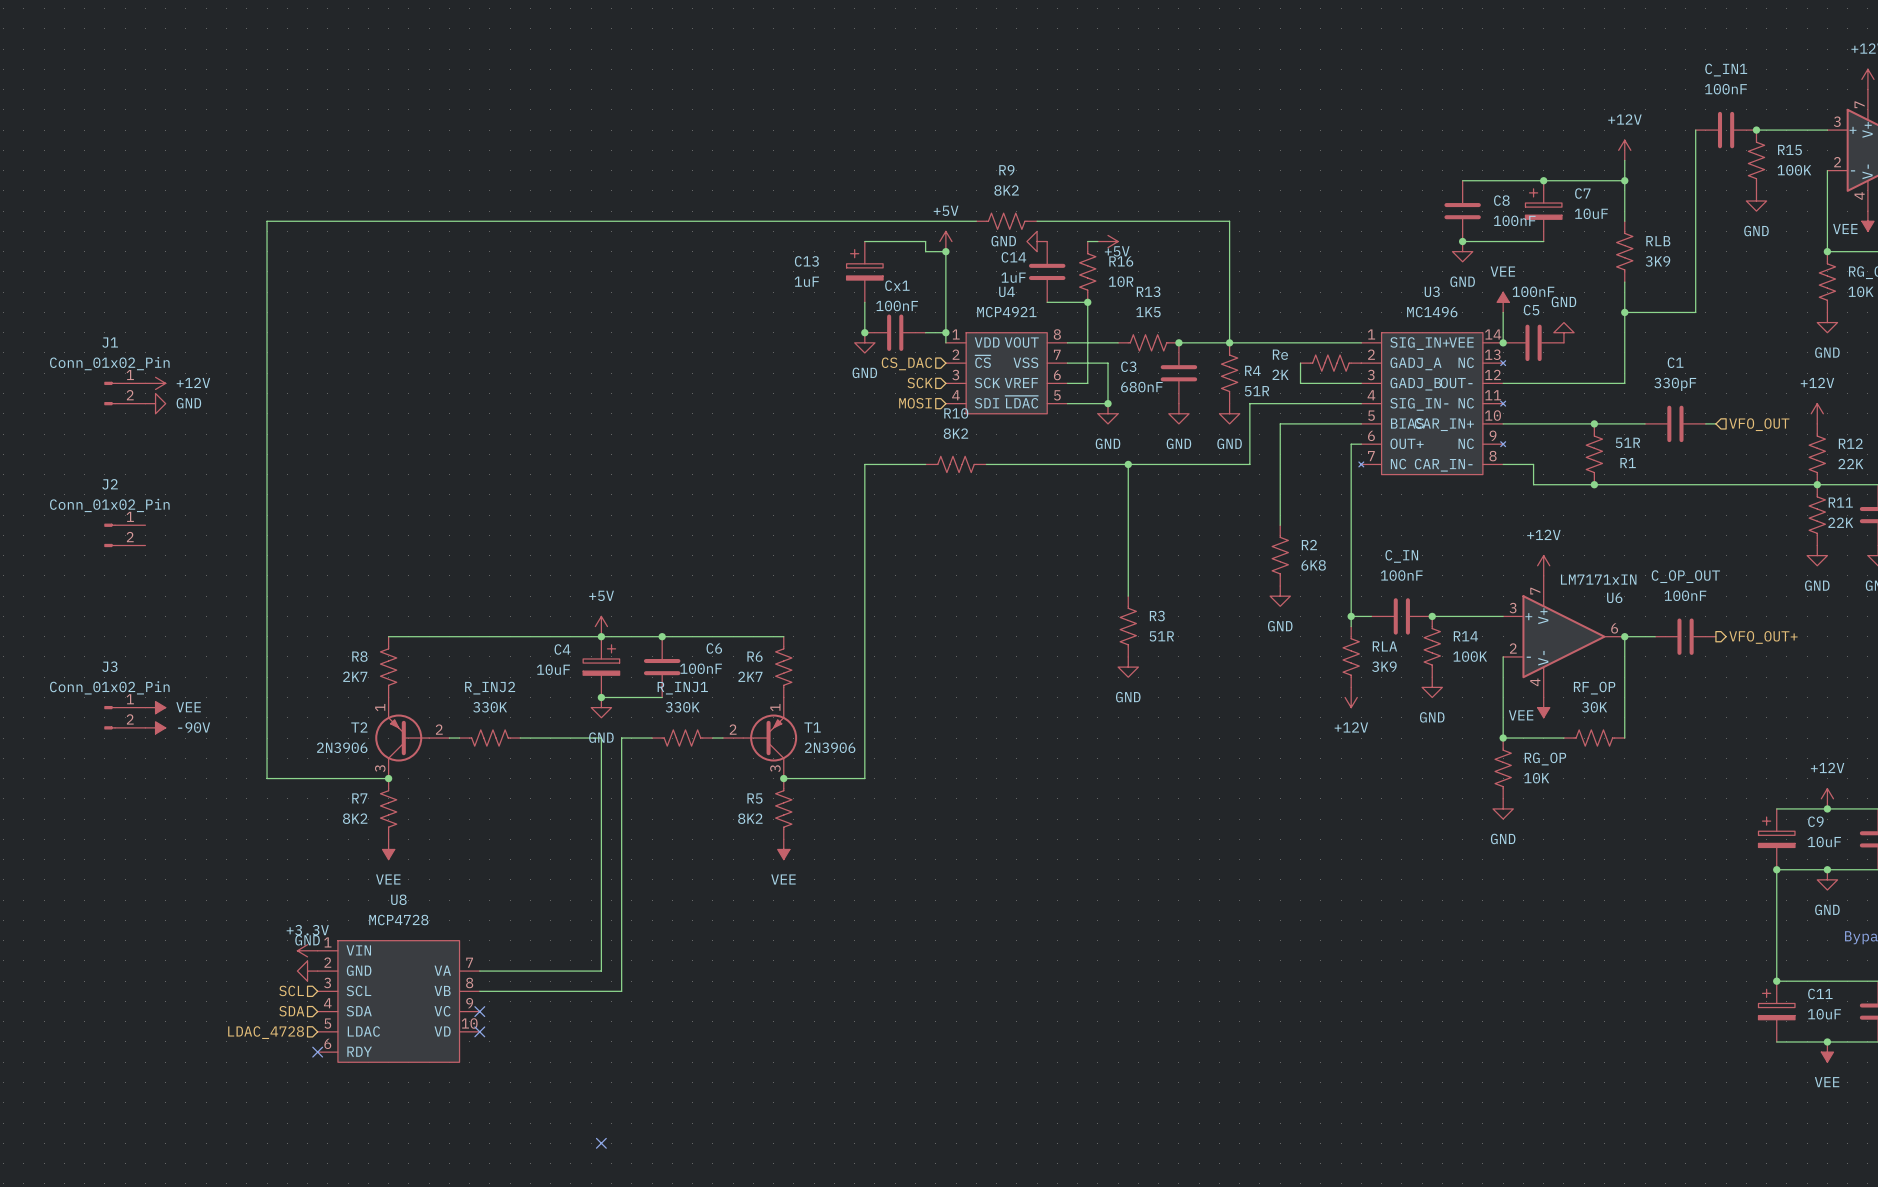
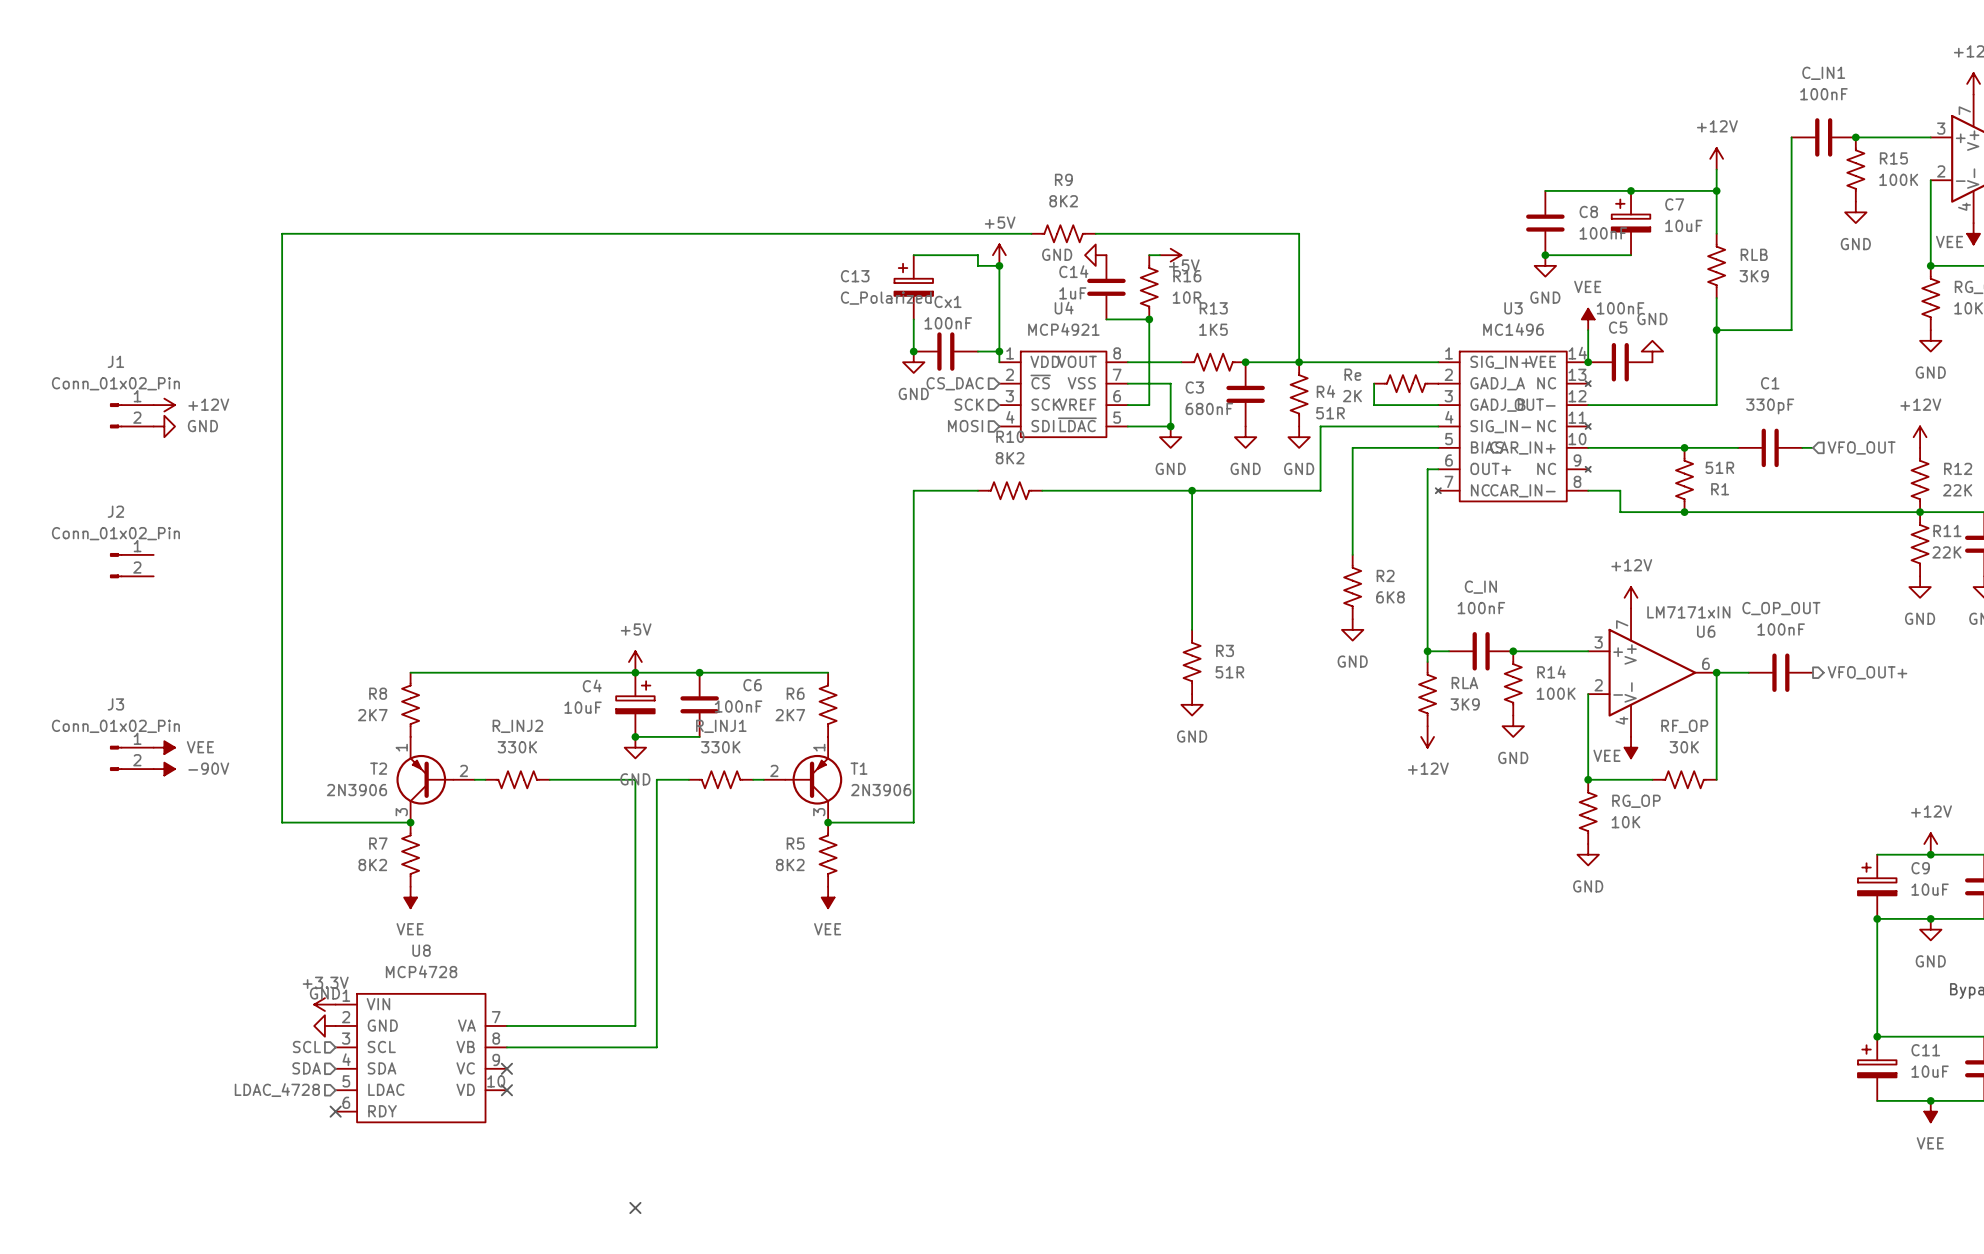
C13 value: 1uF (806, 281) -> C_Polarized (886, 298)

